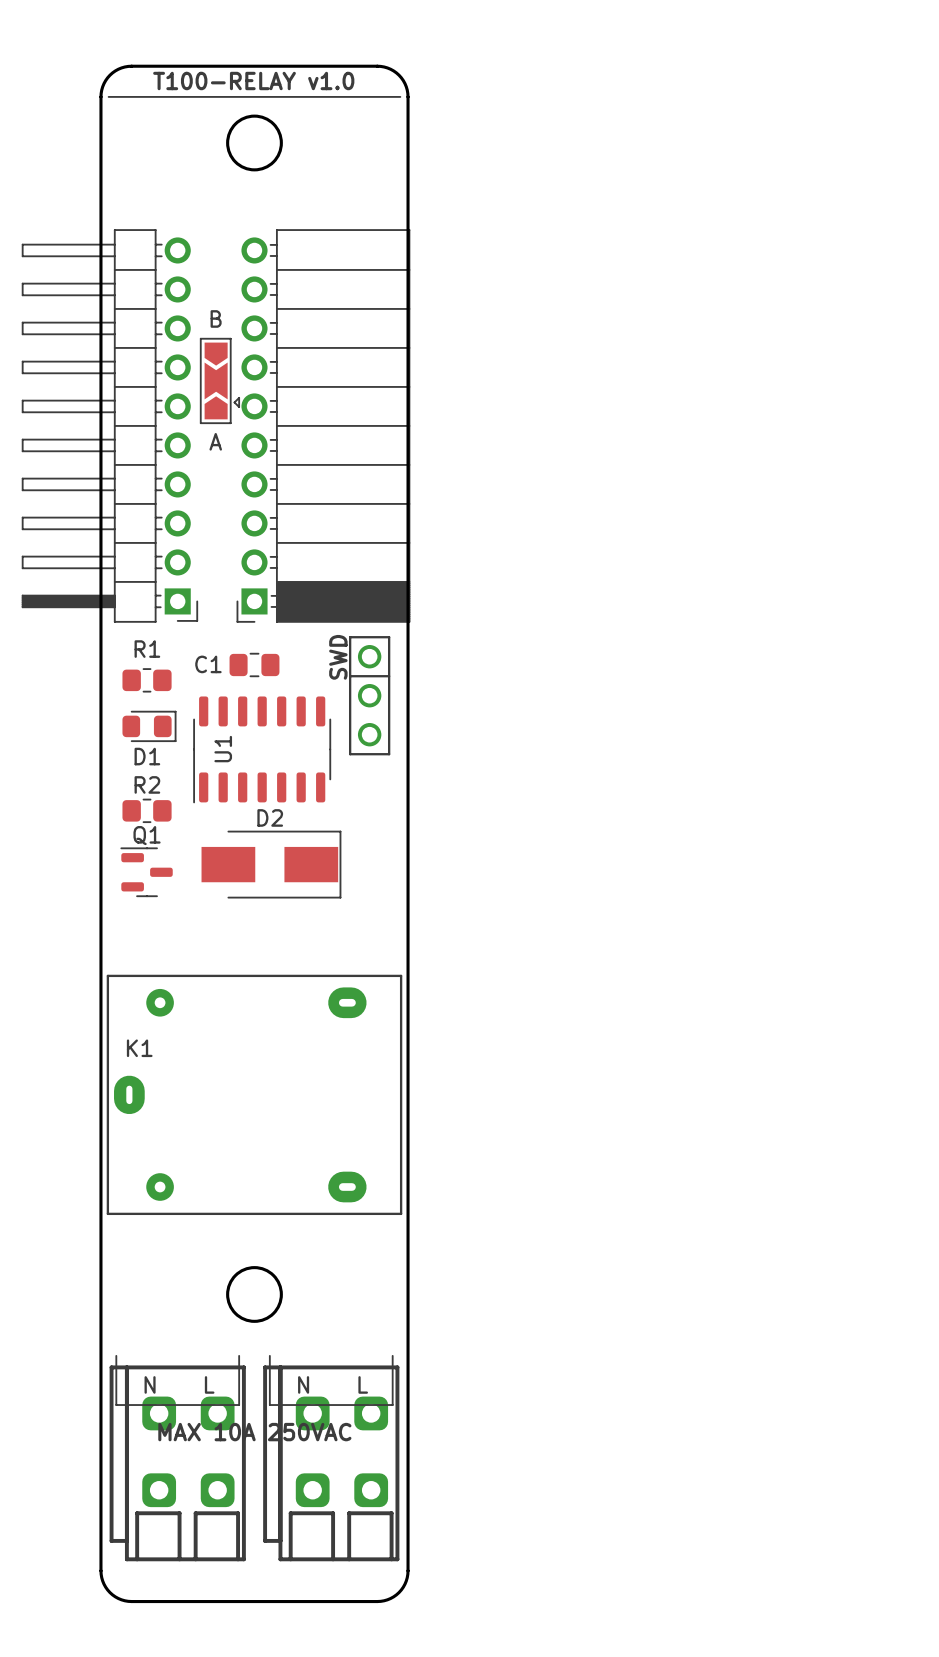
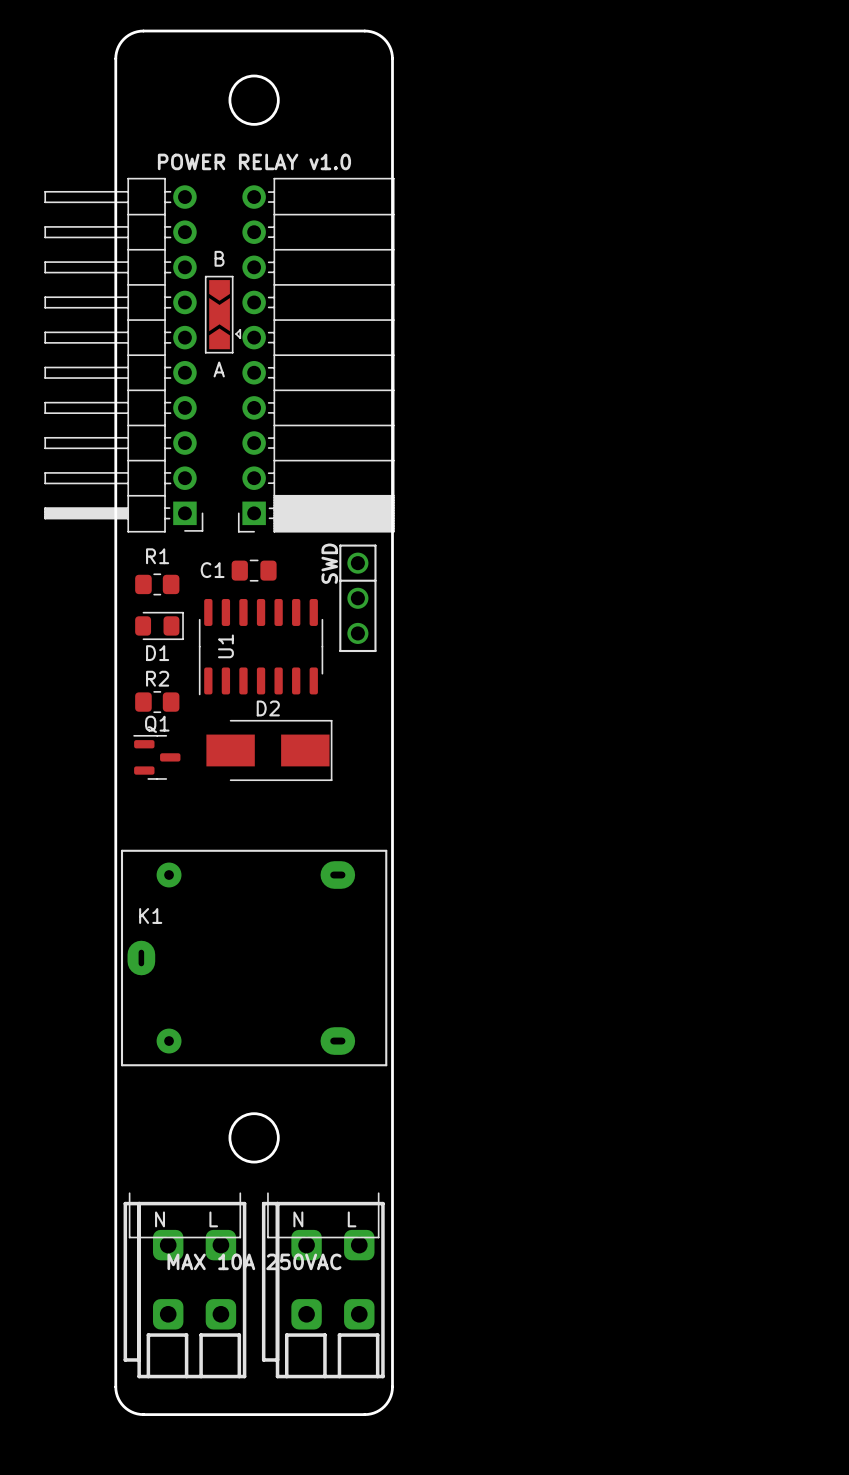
text: T100-RELAY v1.0 (253, 81) -> none
line: (108, 96) (400, 96) -> none
text: none -> POWER RELAY v1.0 (254, 161)

